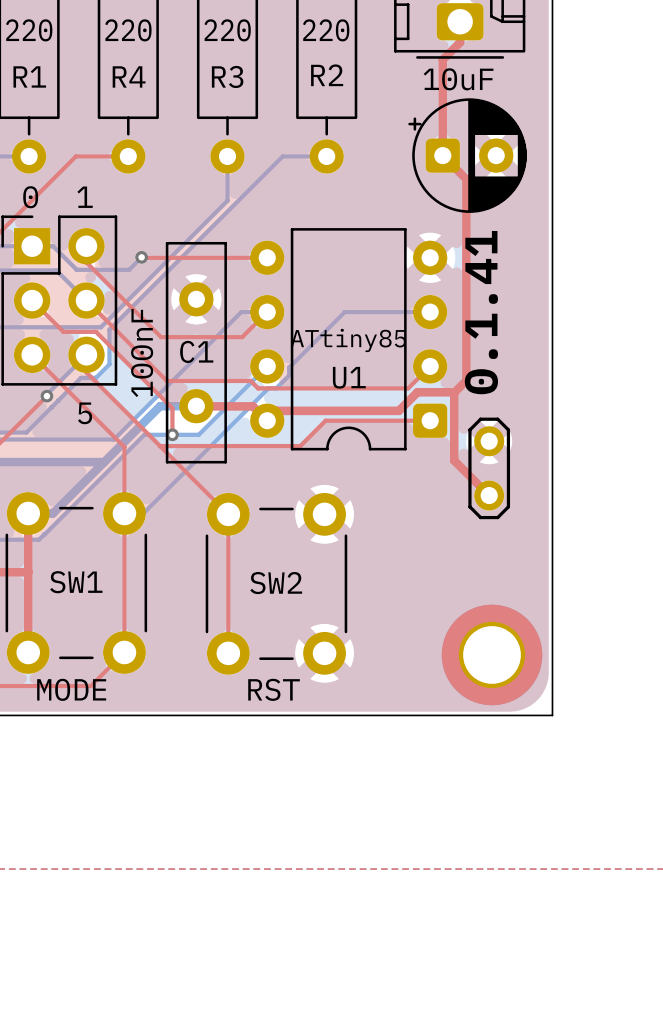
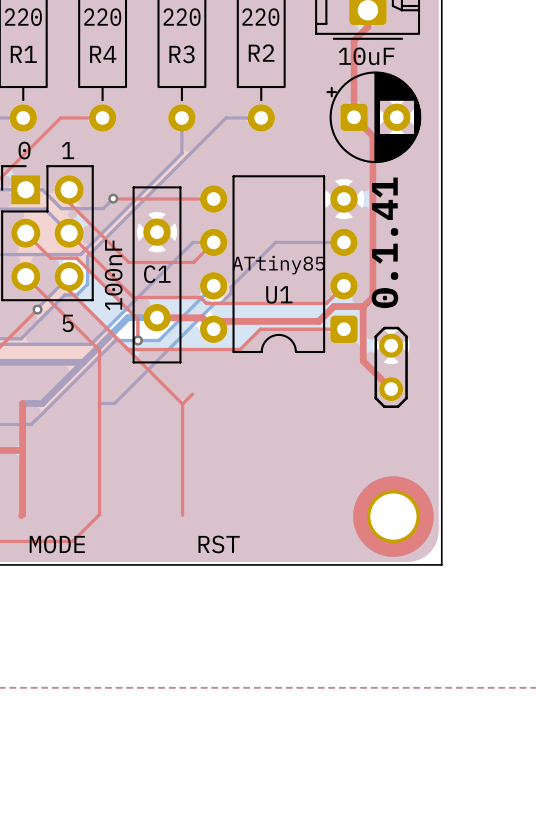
SW1: (76, 582) -> none
SW2: (276, 583) -> none

